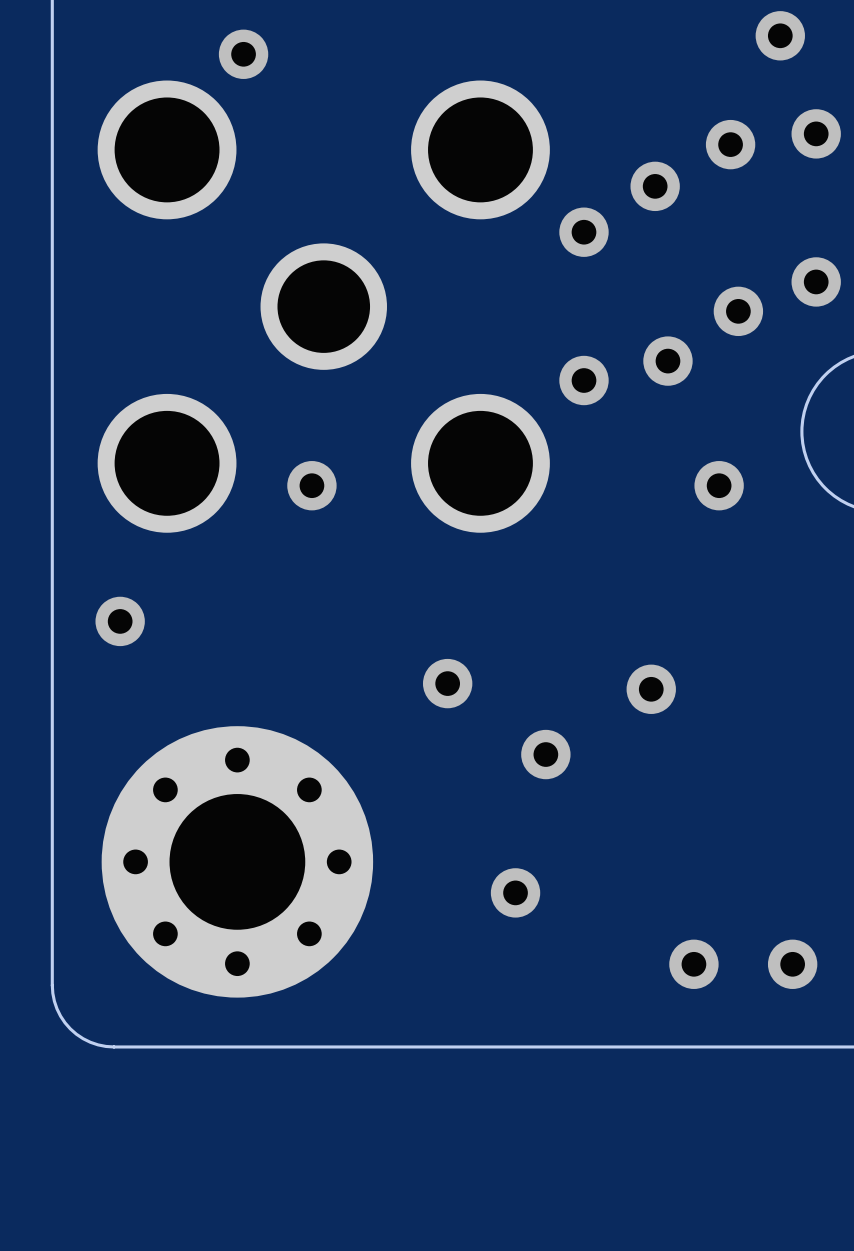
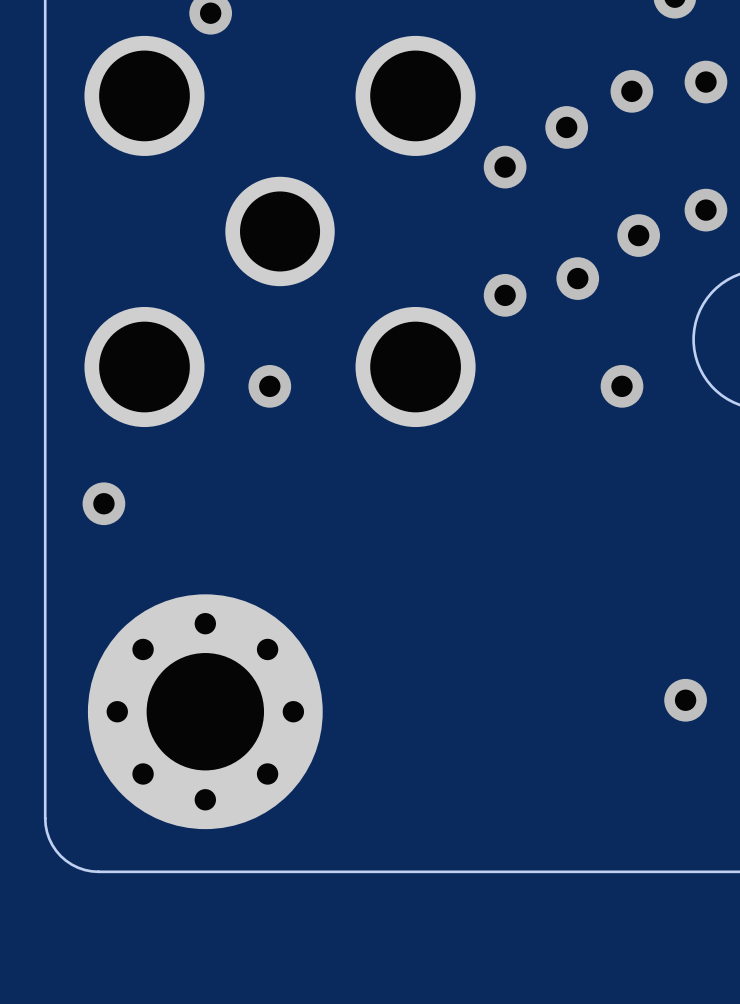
via: (447, 683) -> none
via: (651, 689) -> none
via: (545, 754) -> none
via: none -> (685, 700)
via: (515, 892) -> none
via: (693, 964) -> none
via: (792, 964) -> none

